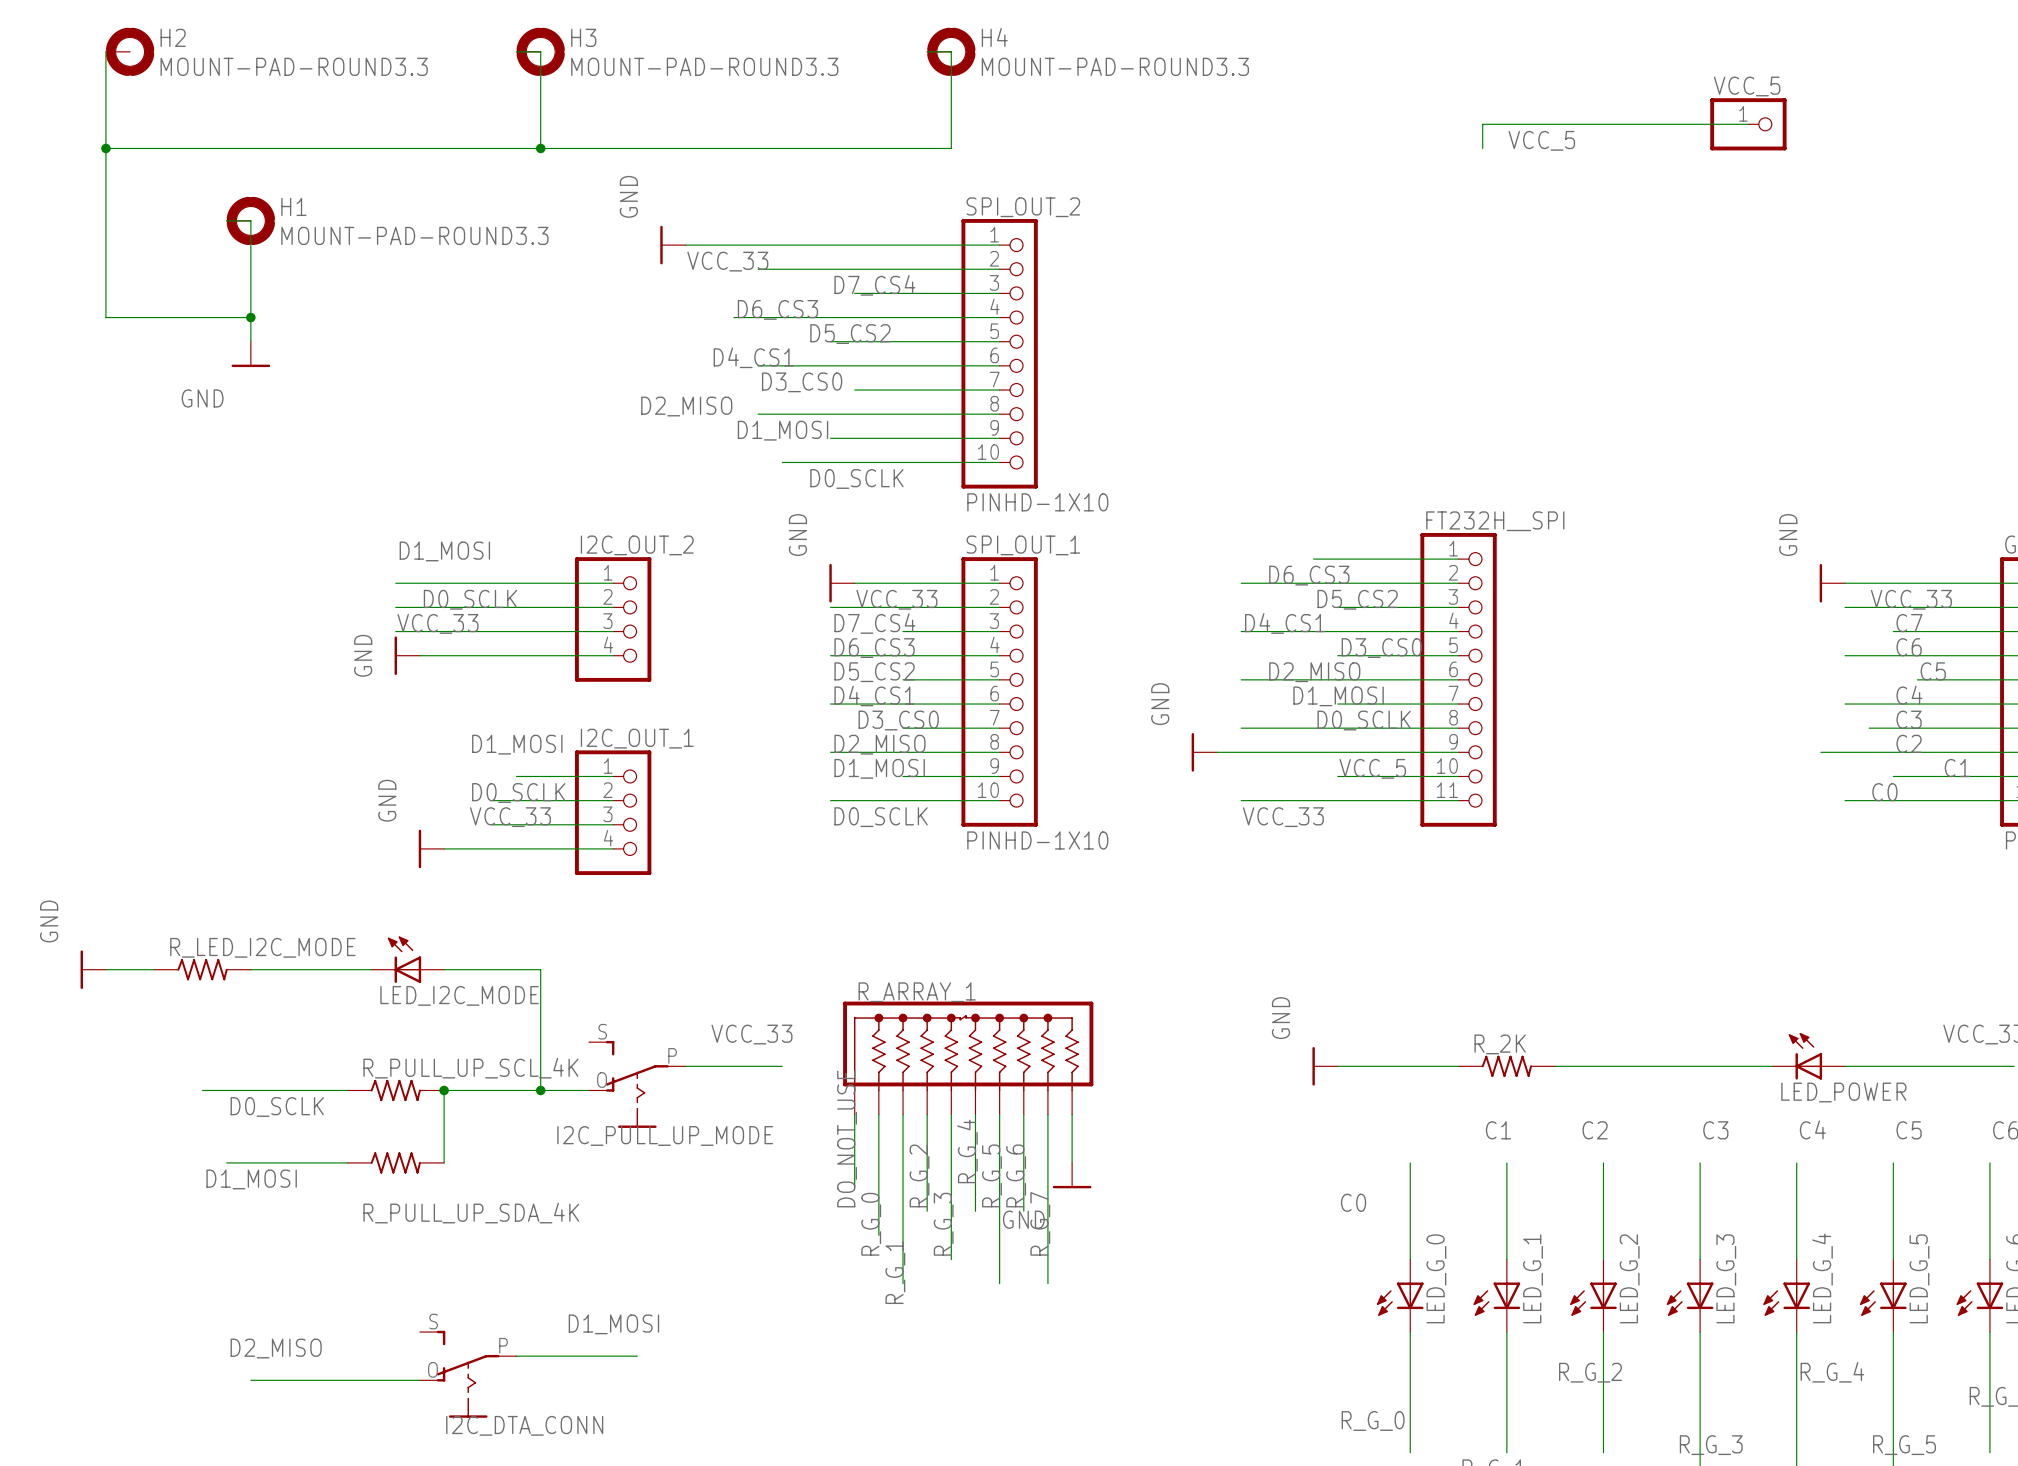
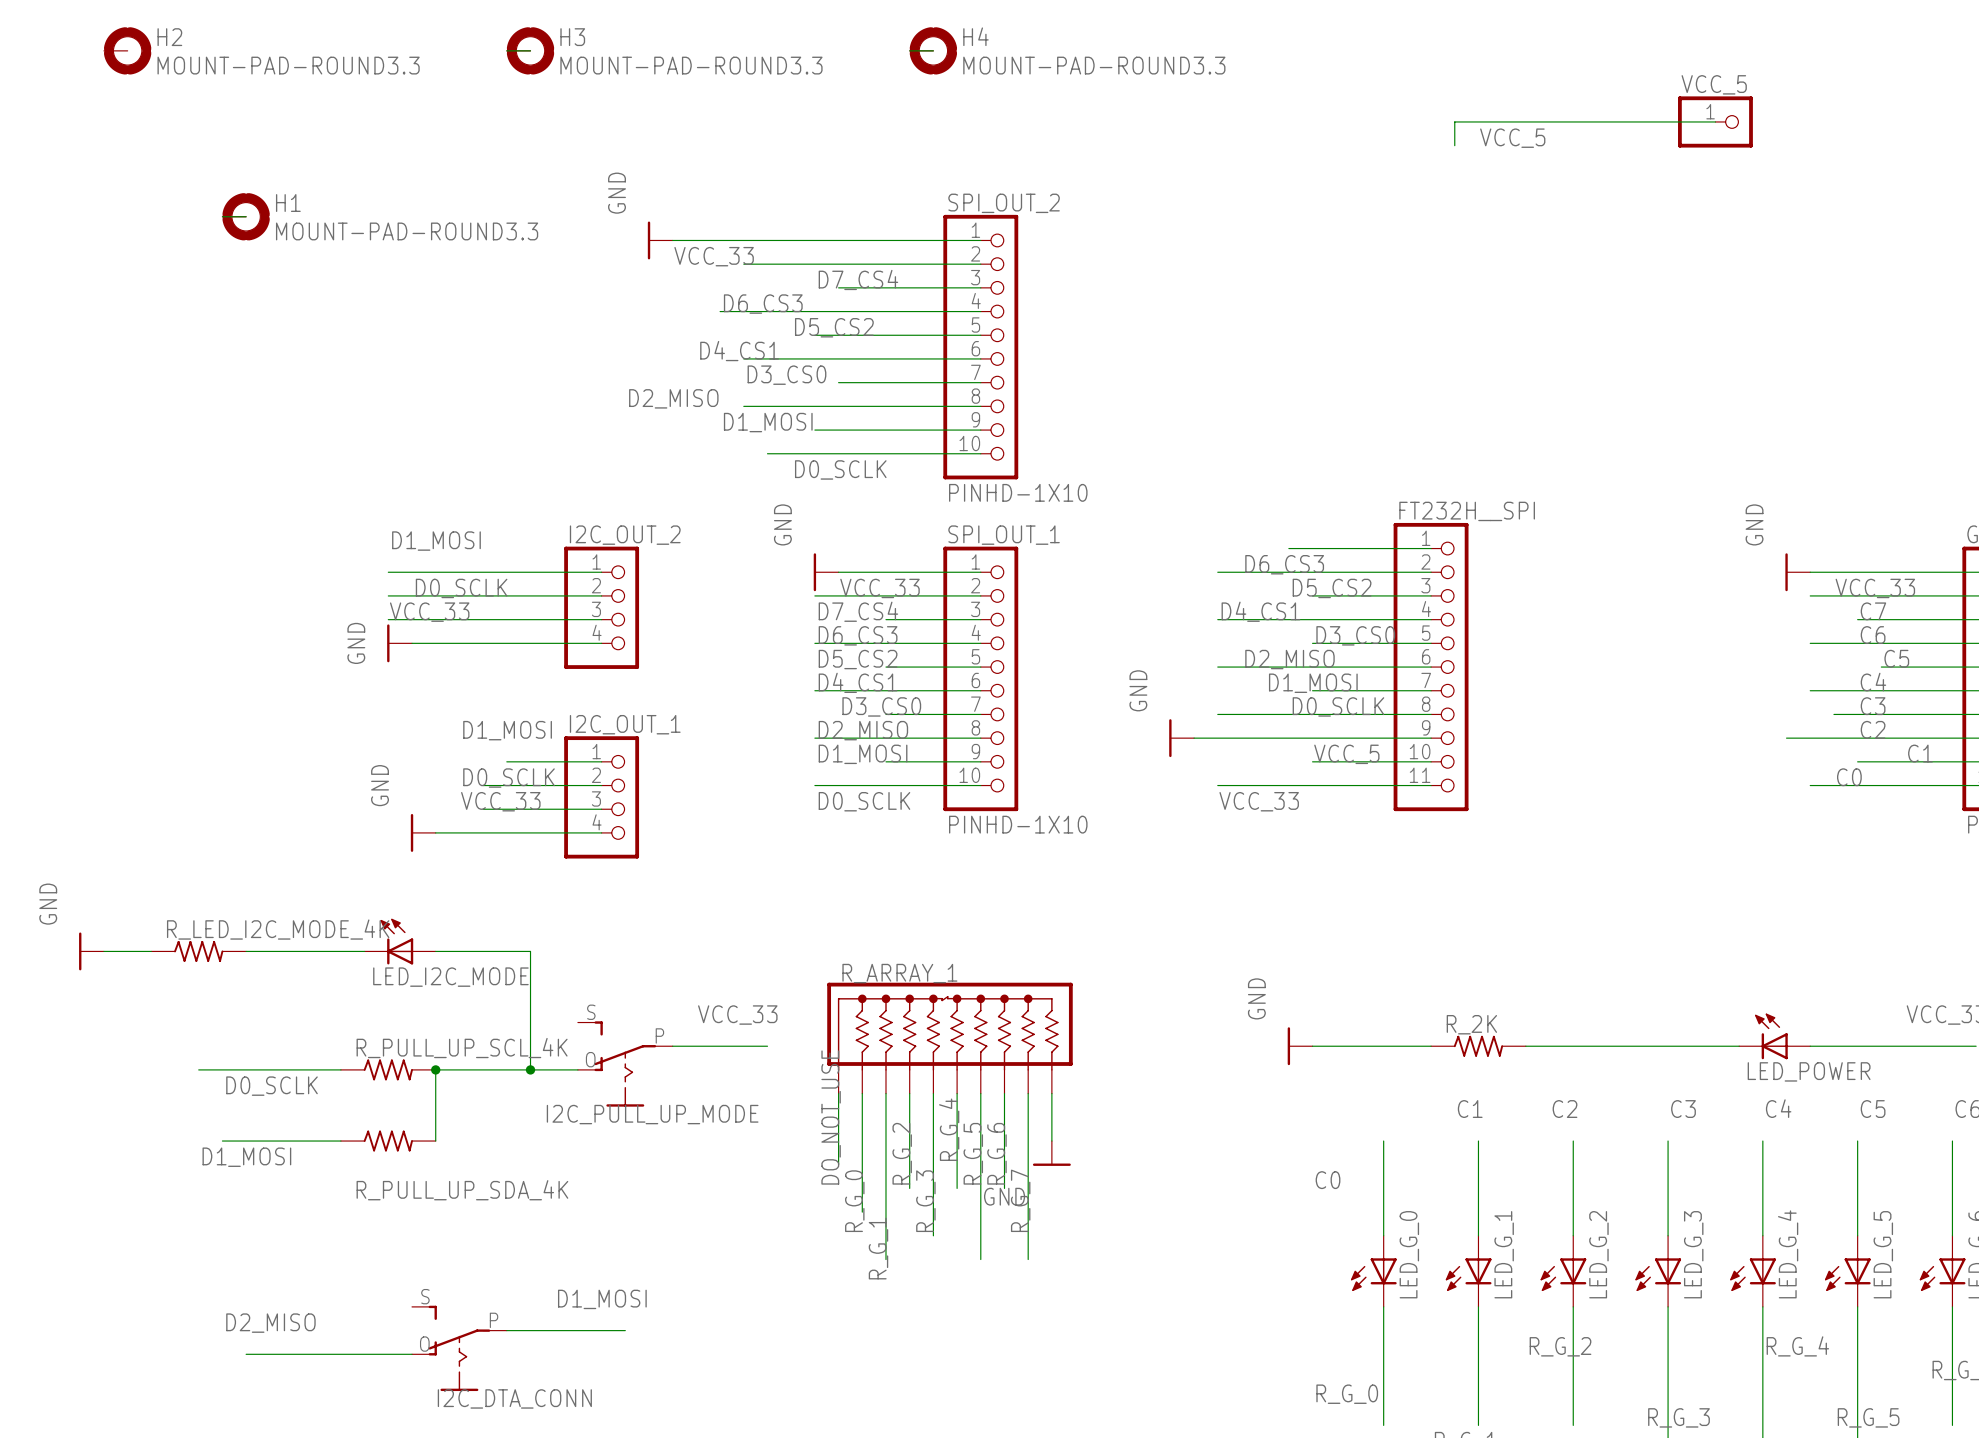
wire: (105, 51) (105, 317) (250, 317) -> none
wire: (540, 51) (540, 148) -> none
wire: (951, 51) (951, 148) (105, 148) -> none
junction: (105, 148) -> none
junction: (540, 148) -> none
wire: (250, 220) (250, 341) -> none
junction: (250, 317) -> none
power symbol: GND (250, 354) -> none
R_LED_I2C_MODE name: R_LED_I2C_MODE (262, 947) -> R_LED_I2C_MODE_4K (278, 929)

